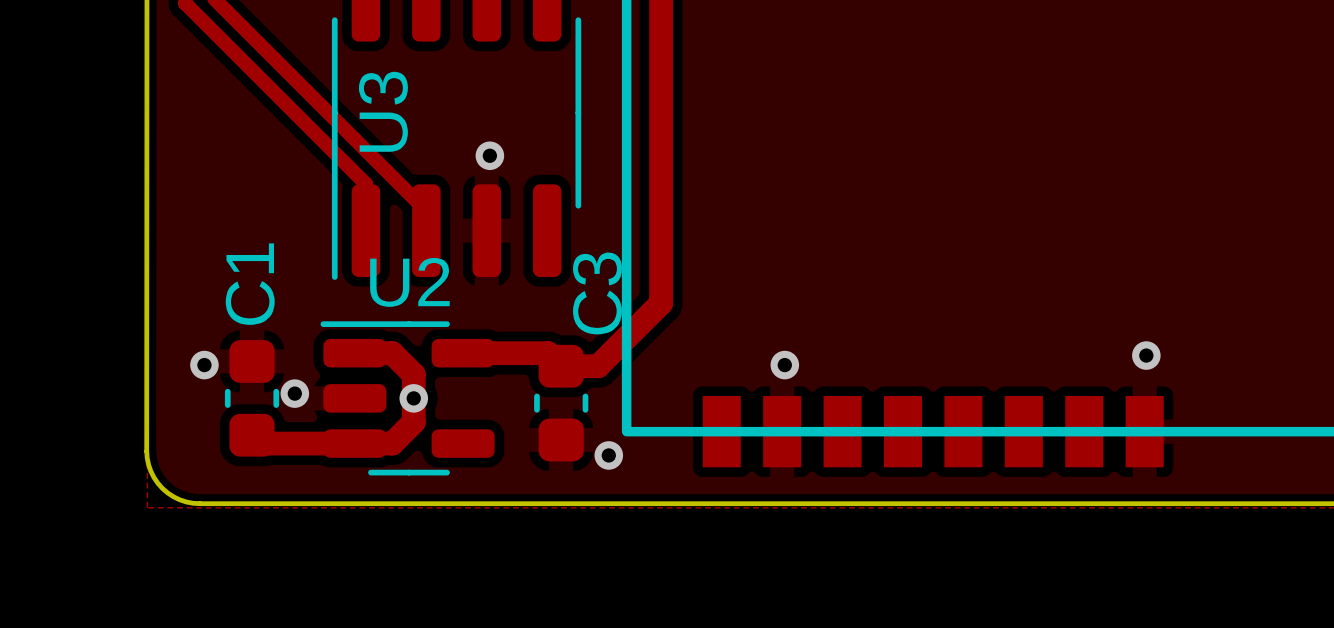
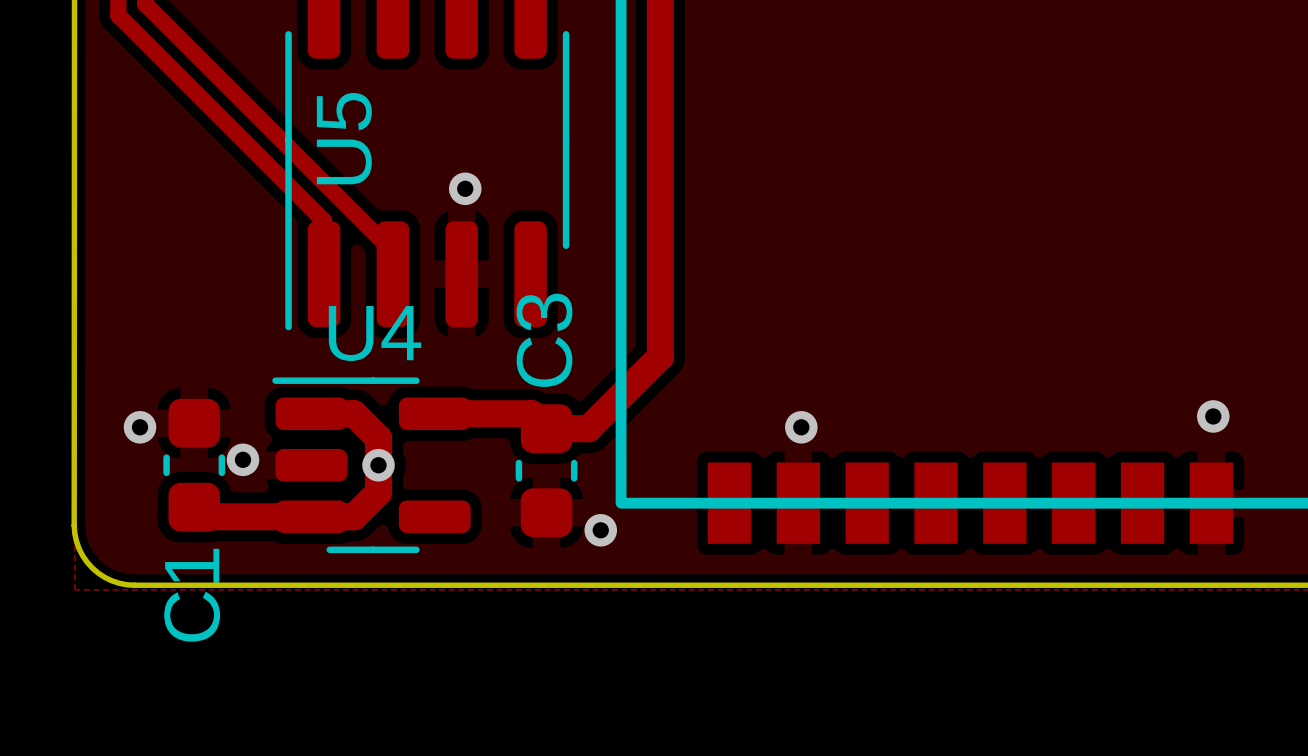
U3 name: U3 (383, 111) -> U5 (344, 138)
U2 name: U2 (409, 282) -> U4 (374, 333)
C1 name position: C1 (250, 284) -> C1 (192, 595)
C3 name position: C3 (597, 293) -> C3 (544, 340)

